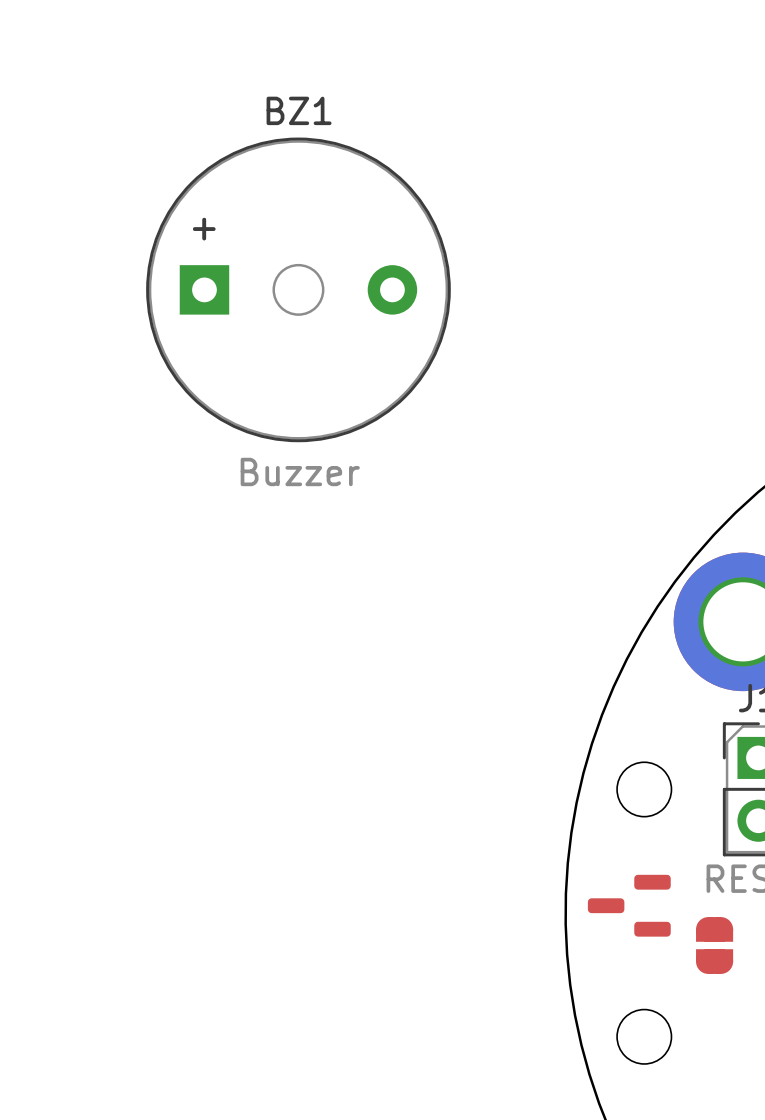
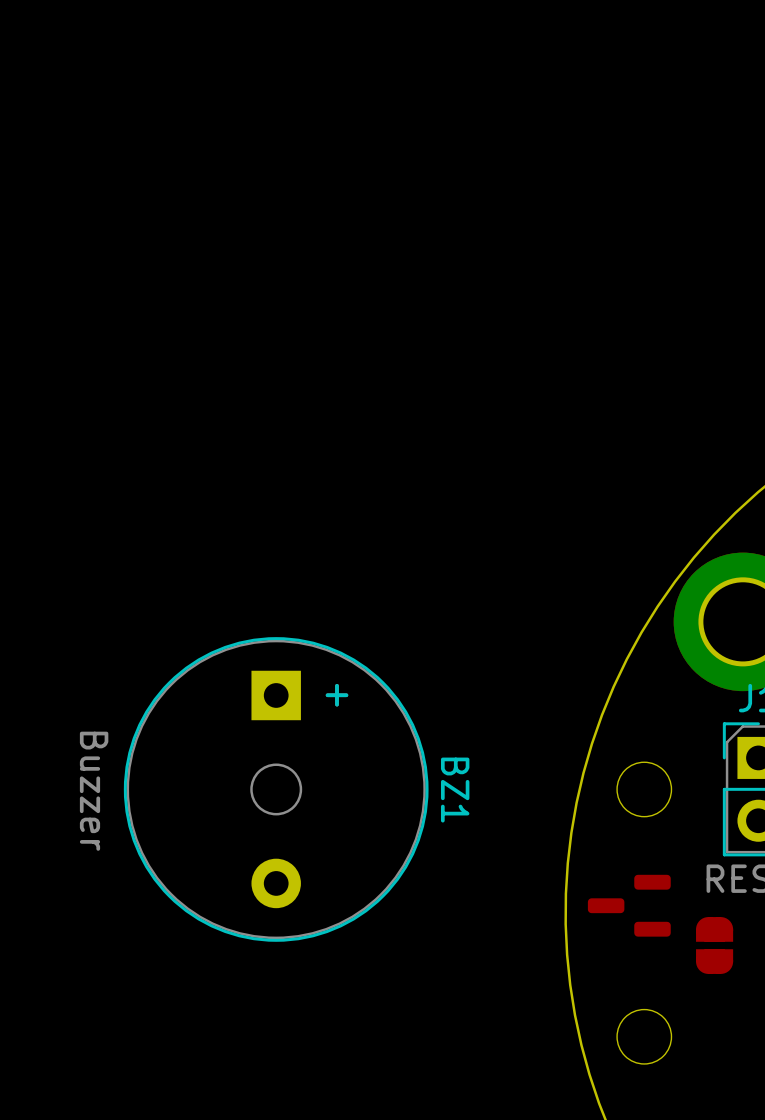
BZ1 rotation: 0° (298, 289) -> 90° clockwise (276, 789)
BZ1 position: (298, 289) -> (276, 789)

